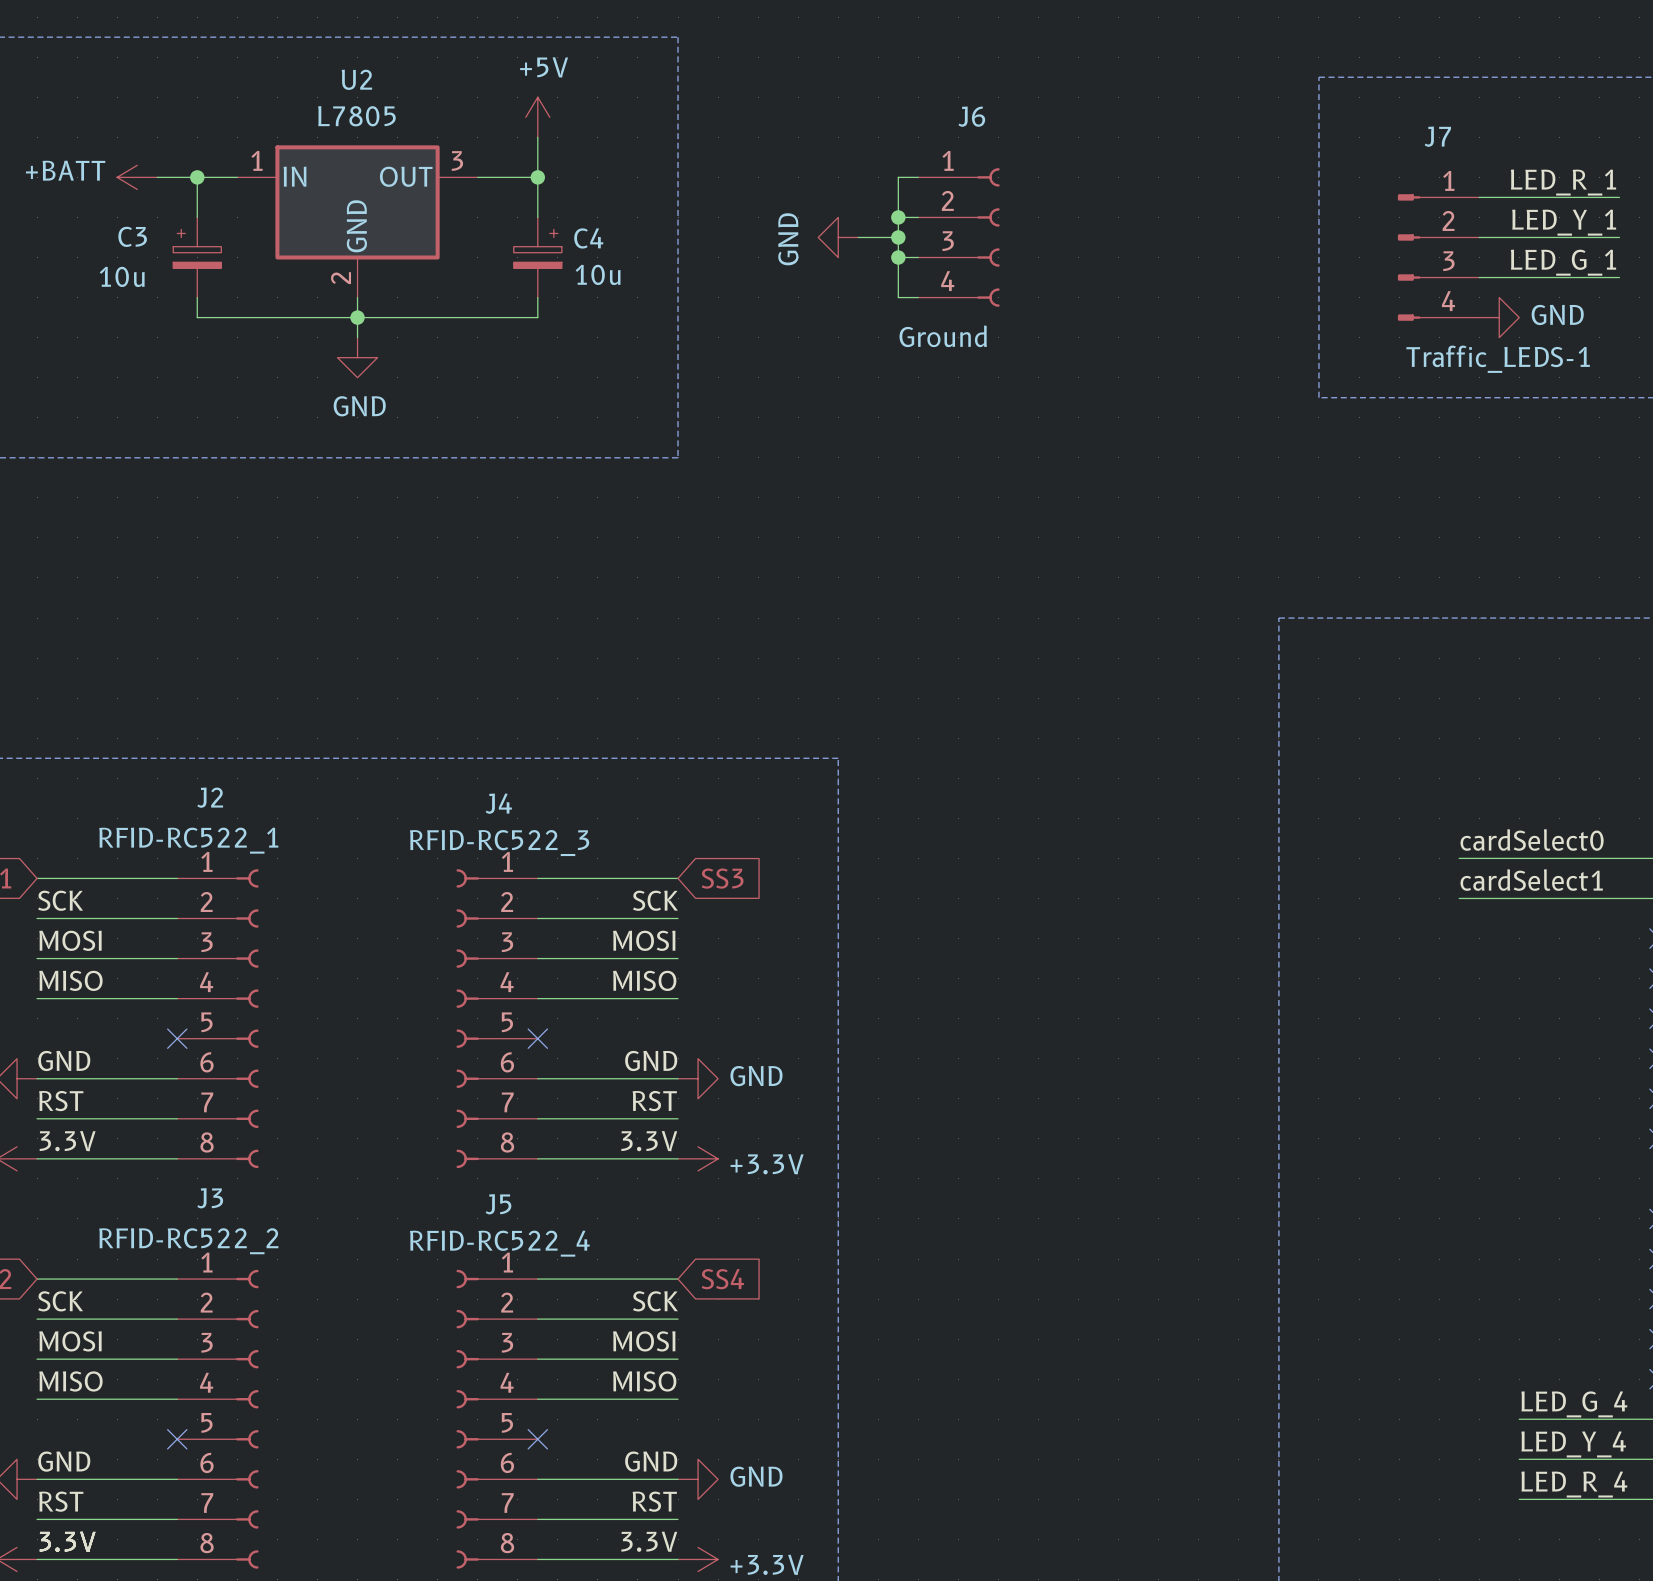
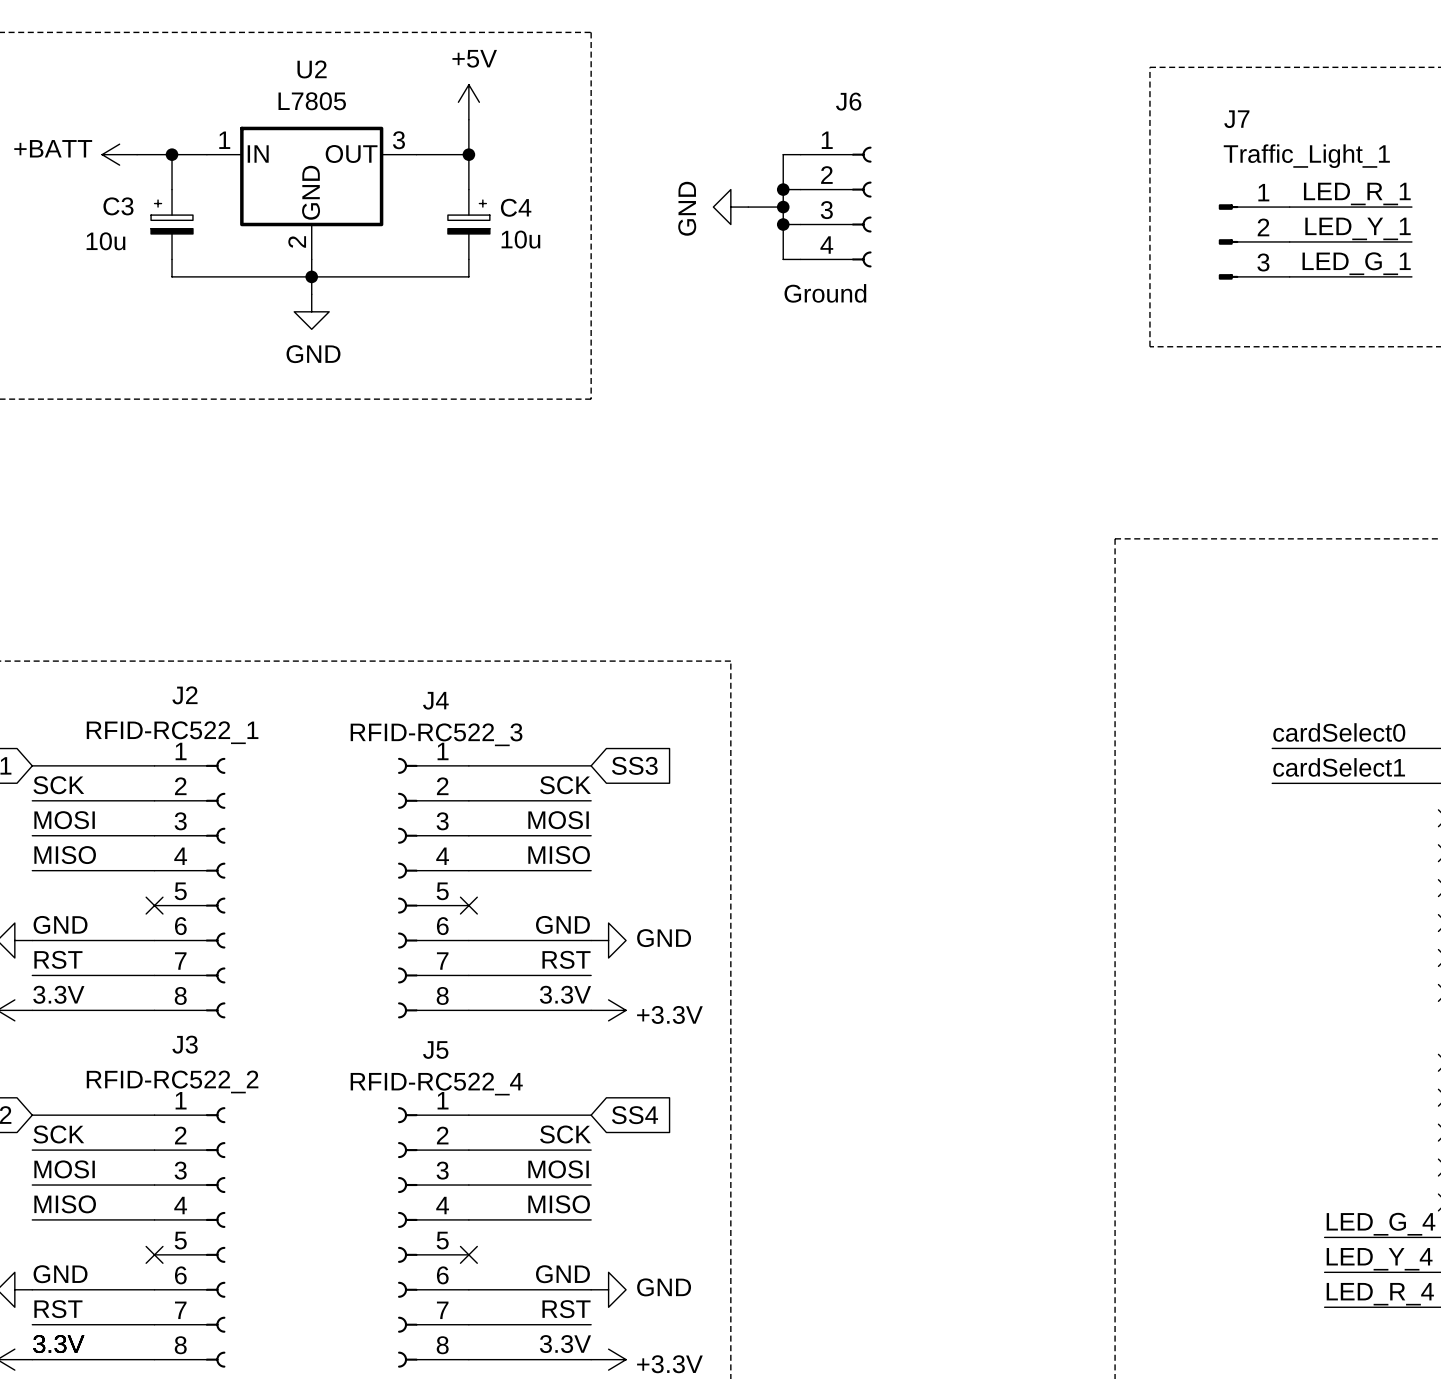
label: LED_R_1 (1563, 182) -> none
J7 symbol: [1397, 194, 1480, 321] -> [1218, 204, 1290, 280]
wire: (1479, 197) (1619, 197) -> (1289, 276) (1411, 276)
label: LED_Y_1 (1564, 222) -> LED_R_1 (1357, 193)
label: LED_G_1 (1563, 262) -> LED_Y_1 (1358, 228)
label: none -> LED_G_1 (1356, 263)
power symbol: GND (1499, 317) -> none
J7 value: Traffic_LEDS-1 (1498, 359) -> Traffic_Light_1 (1306, 156)

